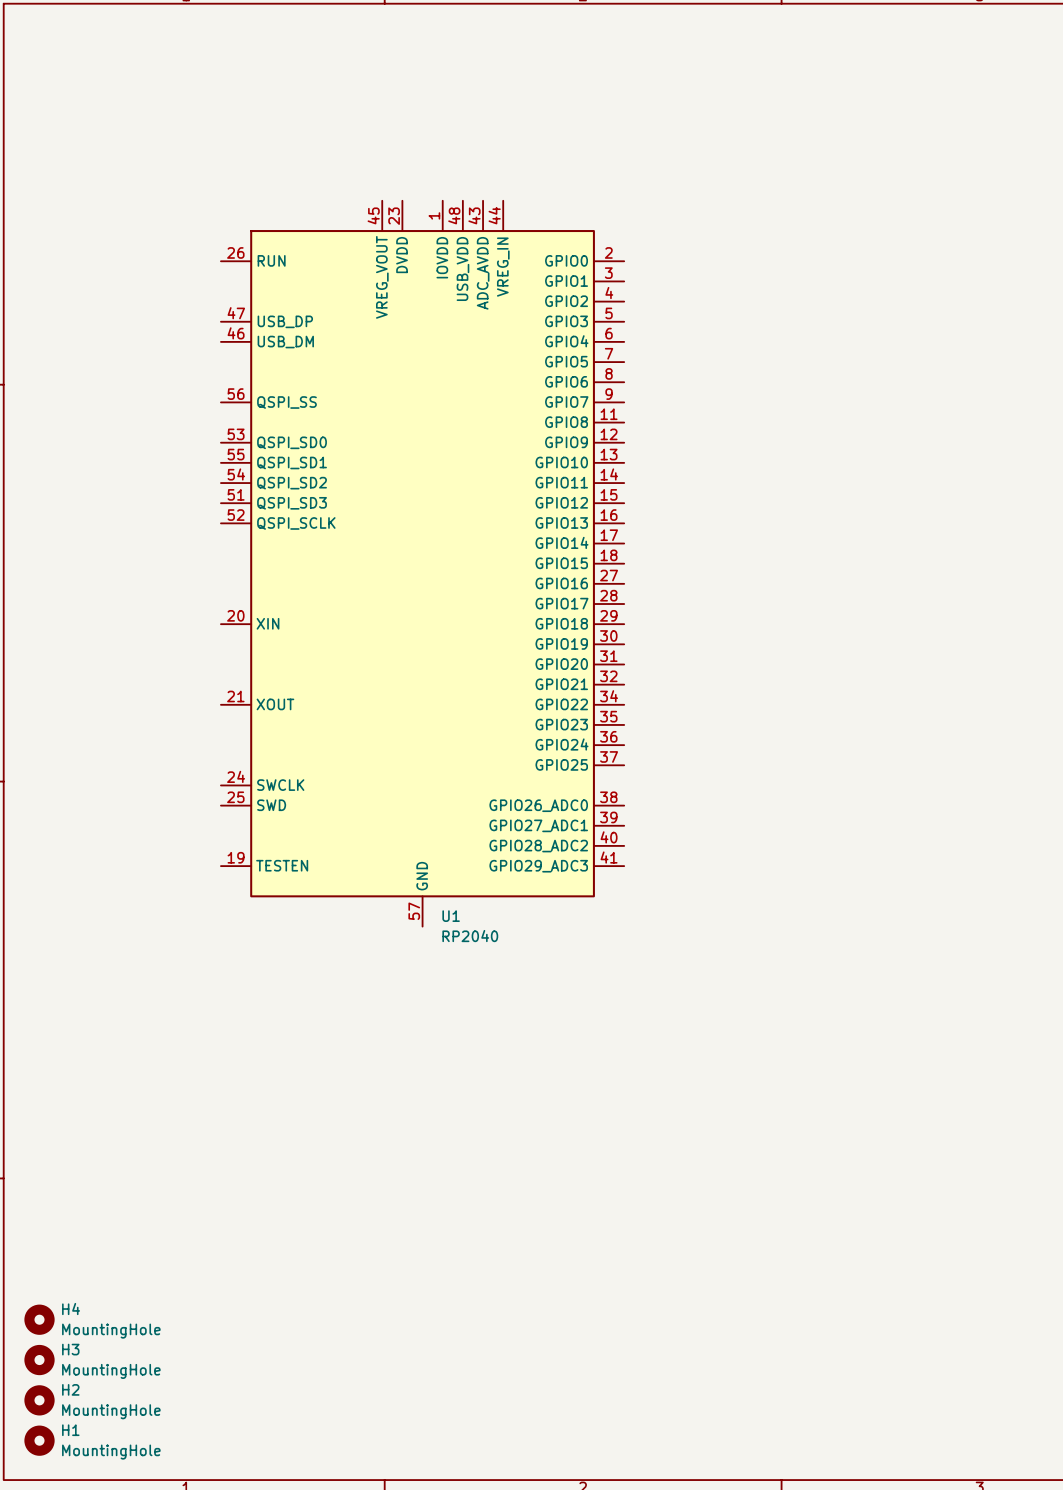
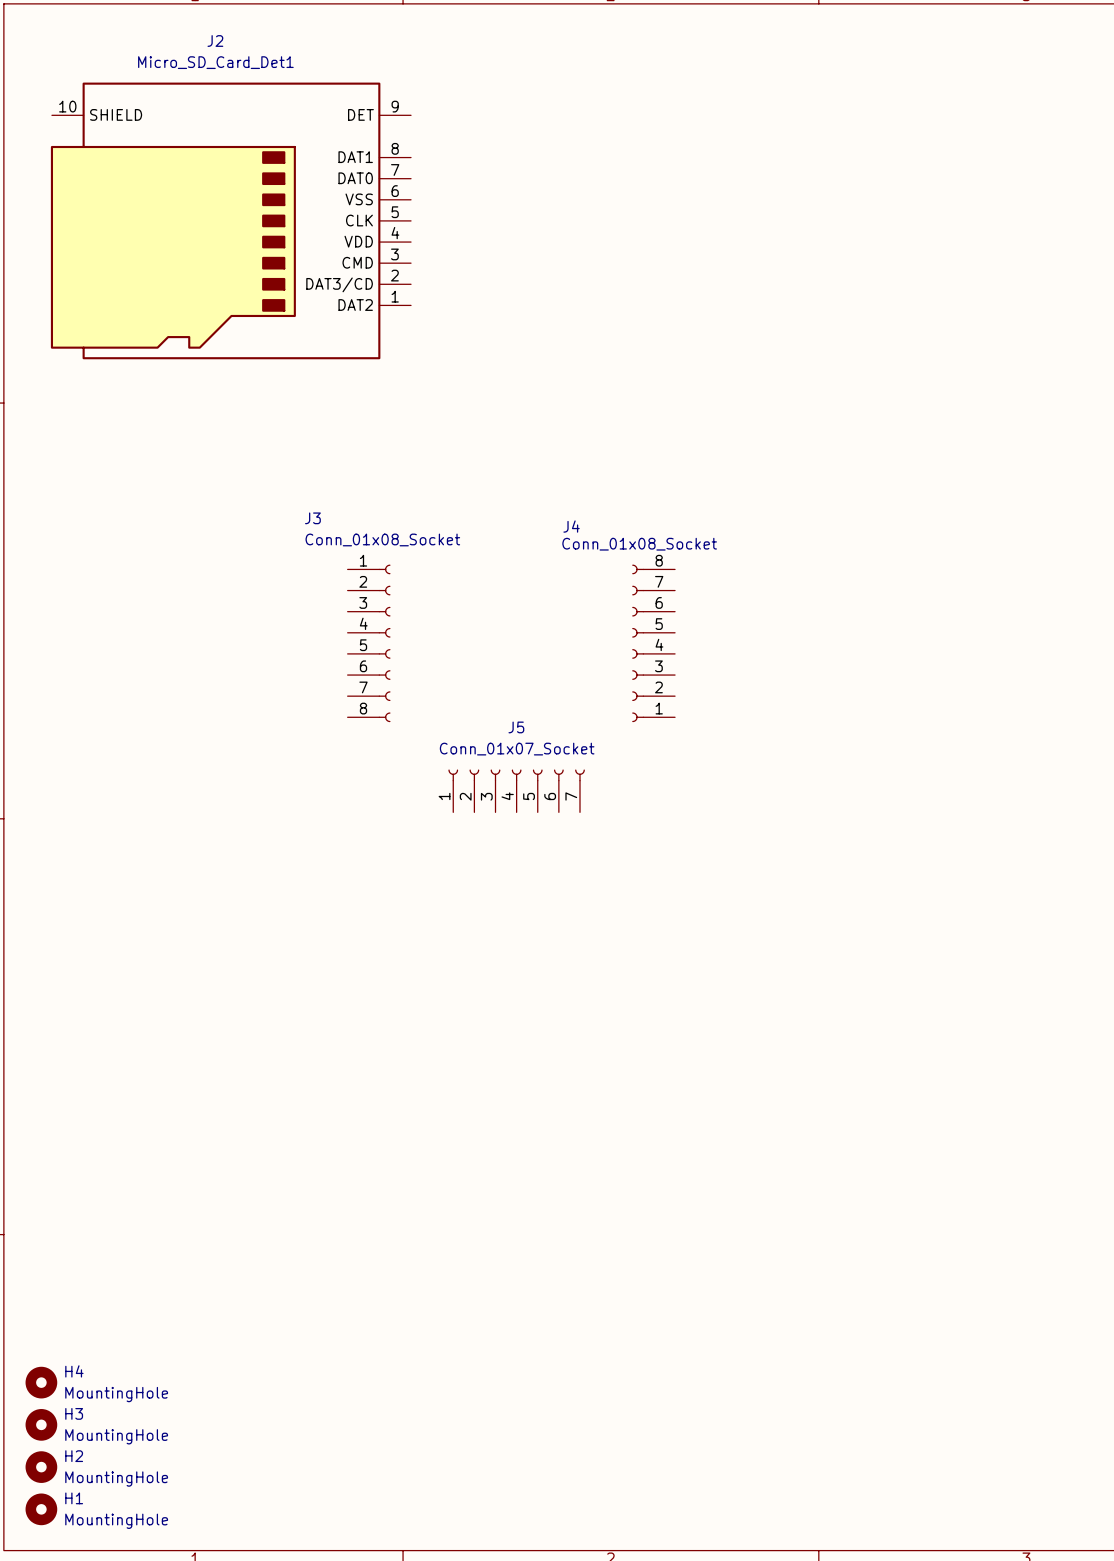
J2: none -> Micro_SD_Card_Det1 (230, 220)
U1: RP2040 (422, 563) -> none
J3: none -> Conn_01x08_Socket (369, 643)
J4: none -> Conn_01x08_Socket (653, 643)
J5: none -> Conn_01x07_Socket (516, 790)

